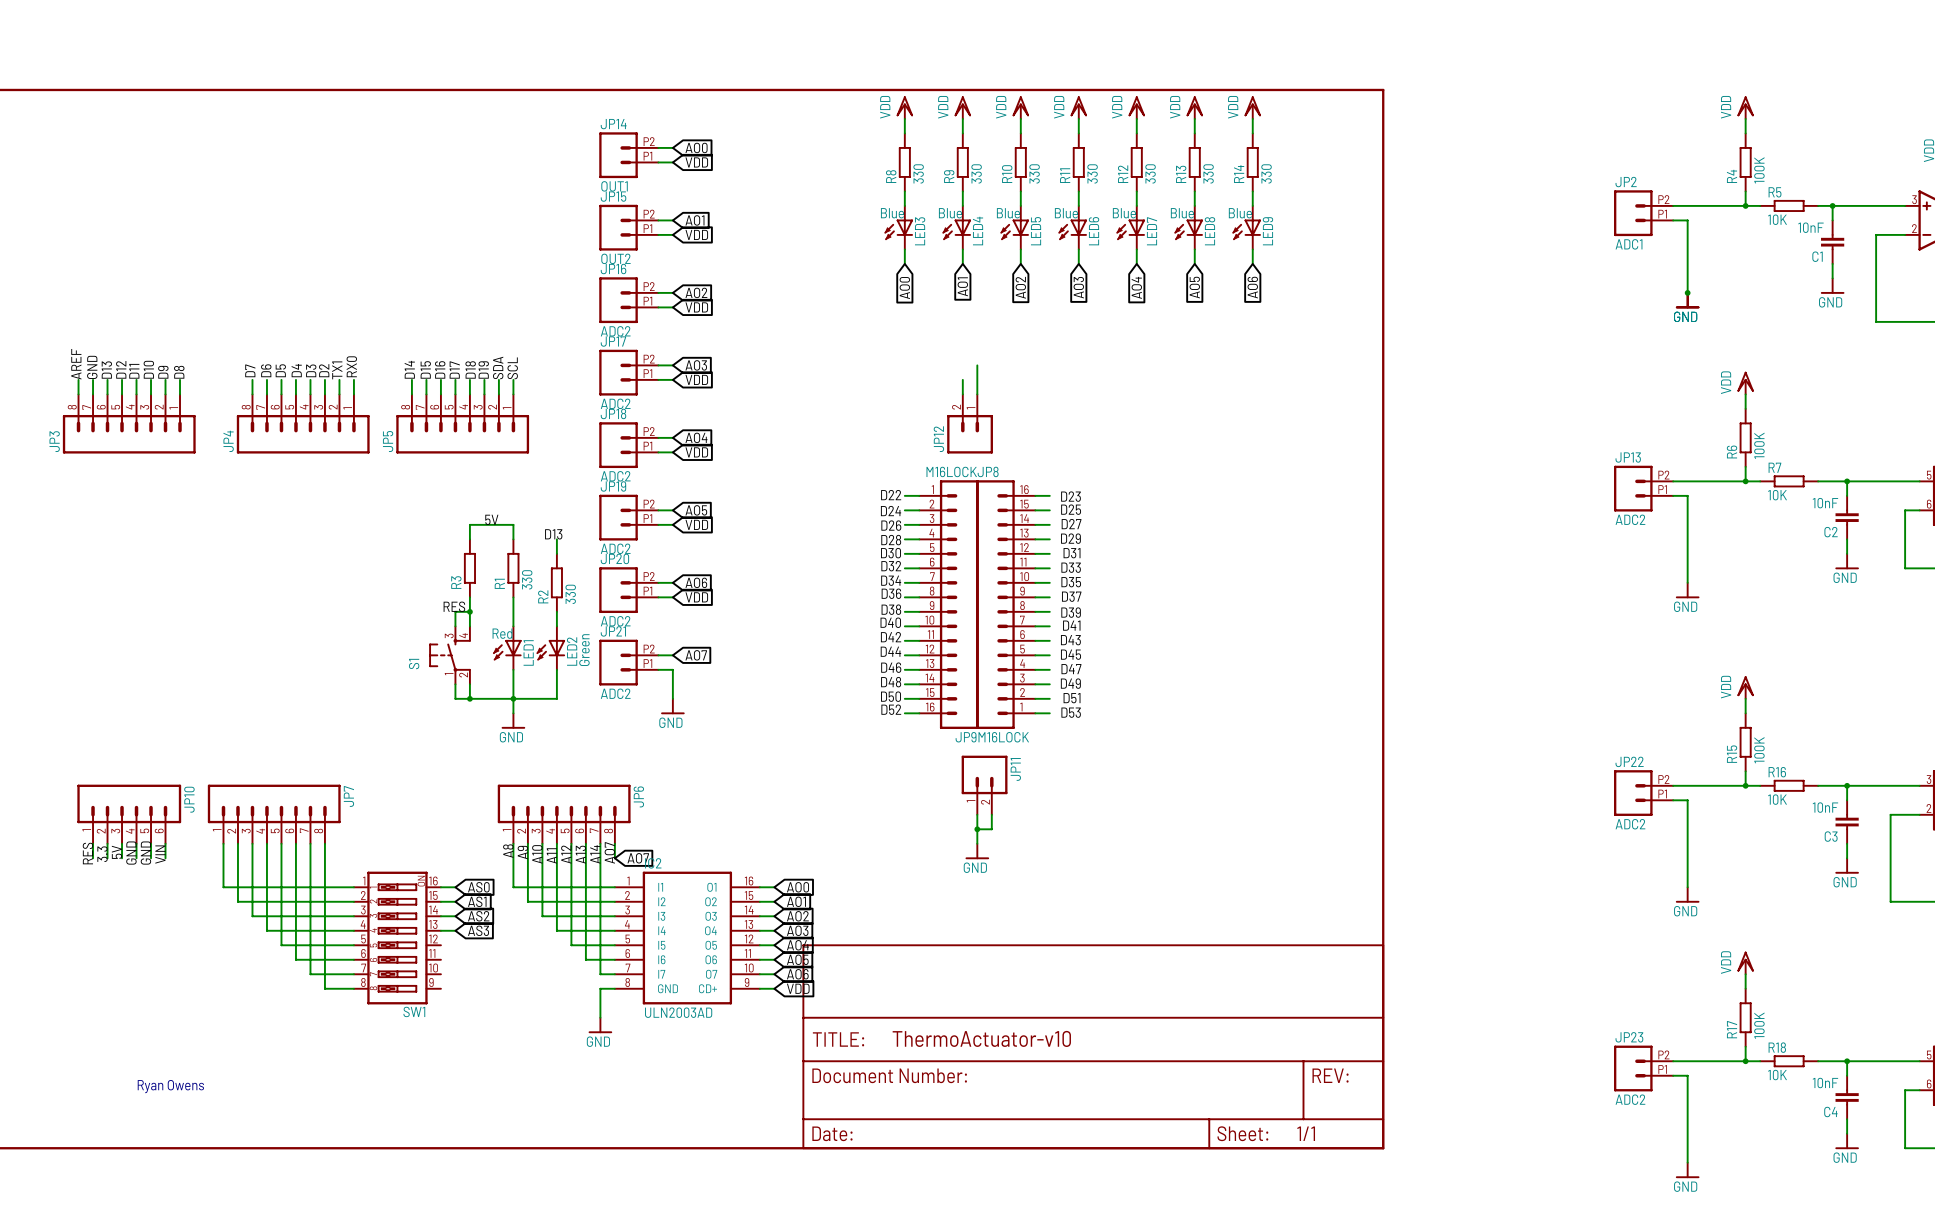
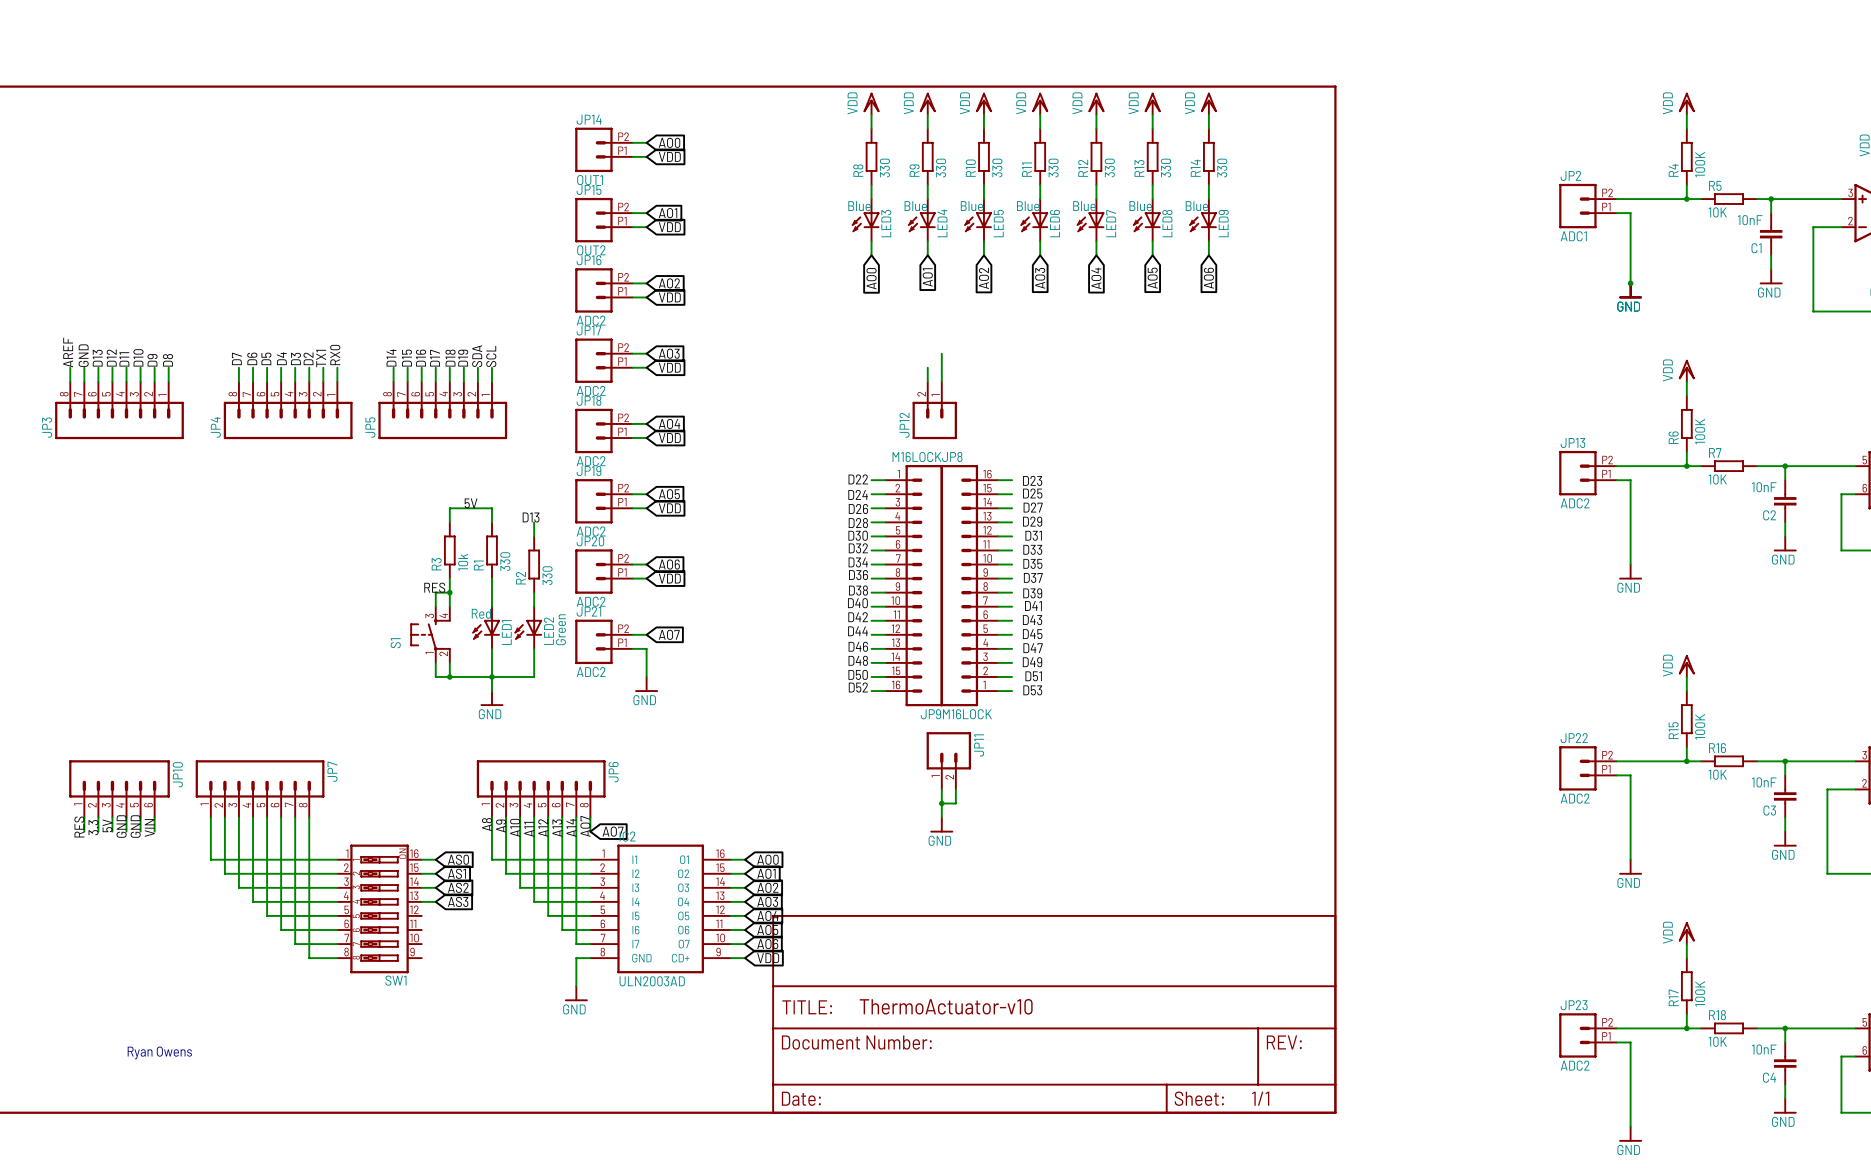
R3 value: none -> 10k (463, 562)

